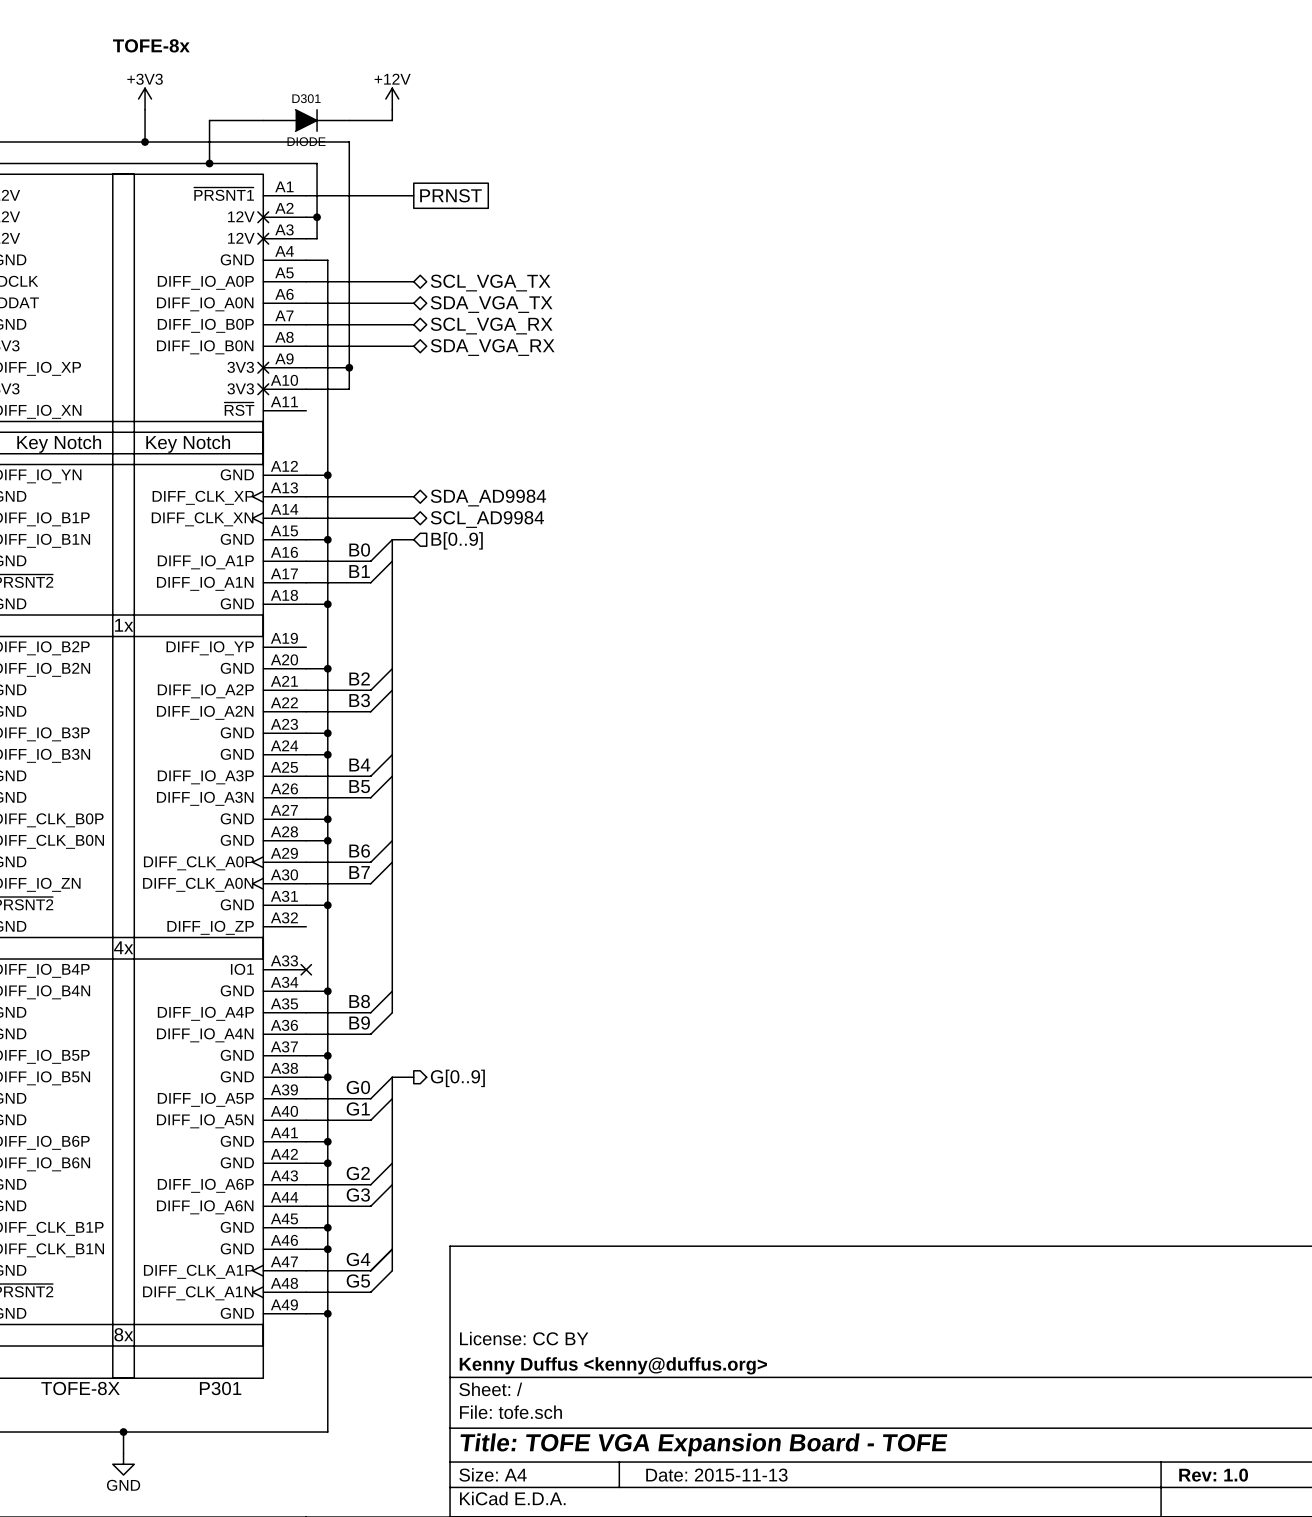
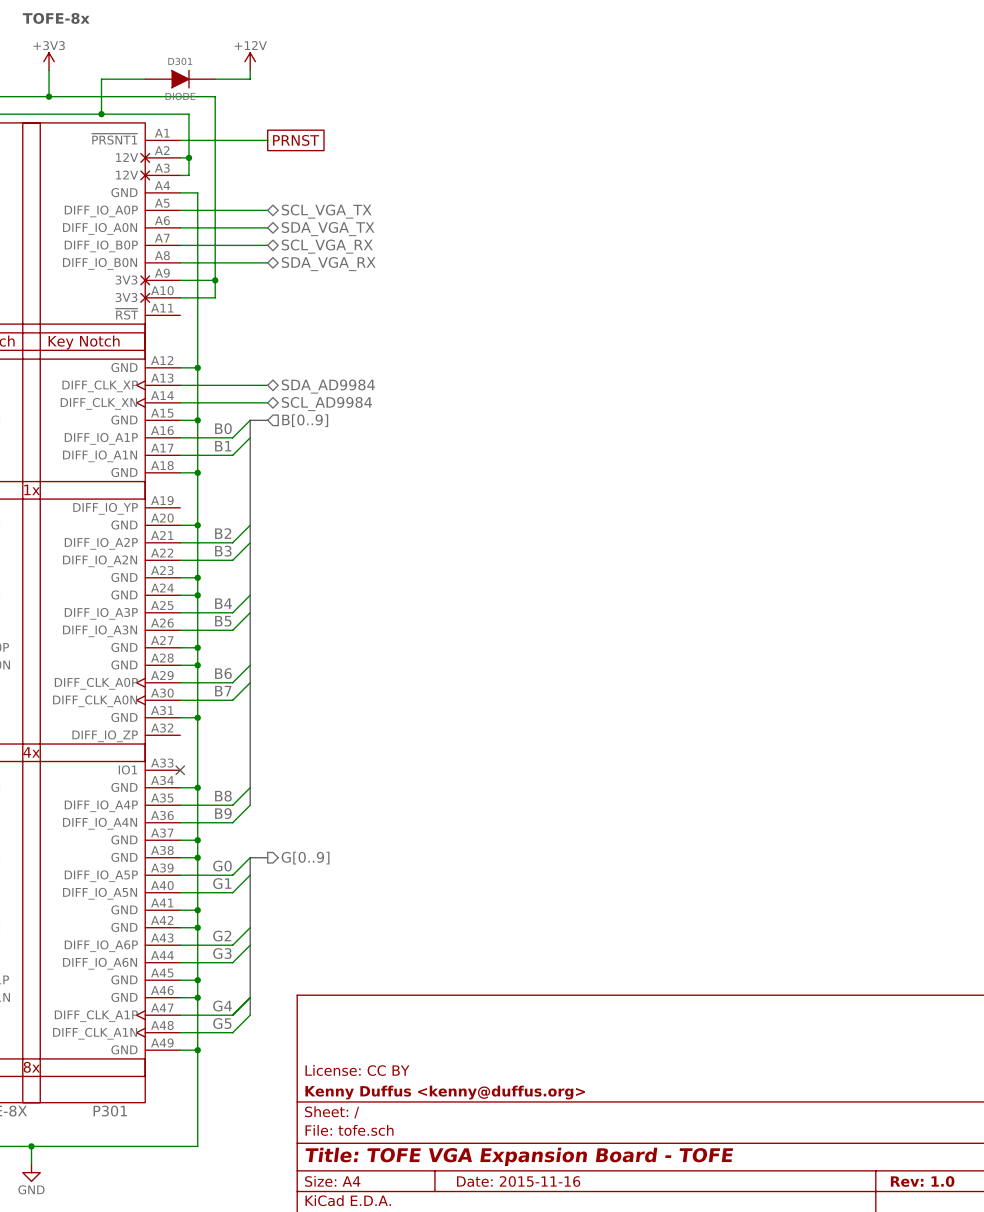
title block: Date: 2015-11-13 (716, 1475) -> Date: 2015-11-16 (518, 1181)

